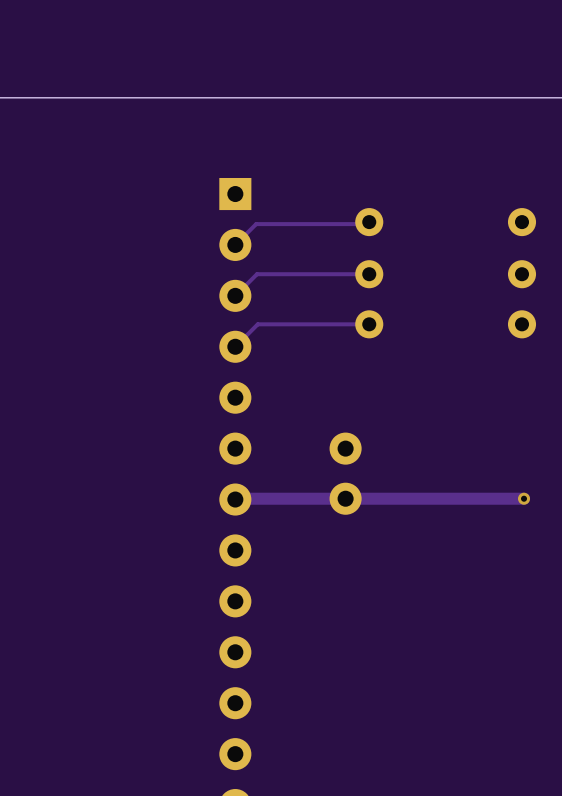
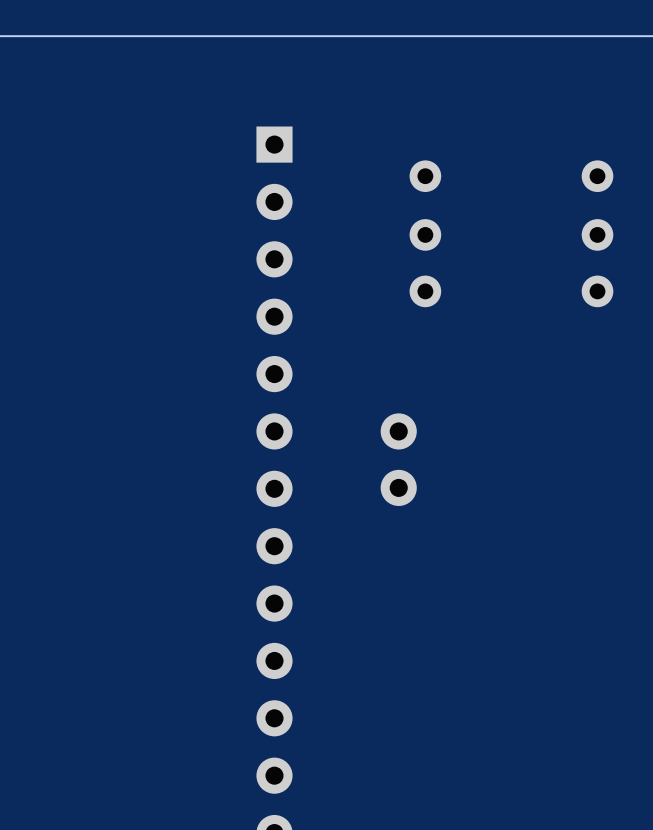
track: (369, 222) (367, 224) (256, 224) (235, 244) -> none
track: (369, 274) (256, 274) (235, 295) -> none
track: (369, 324) (257, 324) (235, 346) -> none
track: (524, 498) (235, 499) -> none
via: (524, 498) -> none

